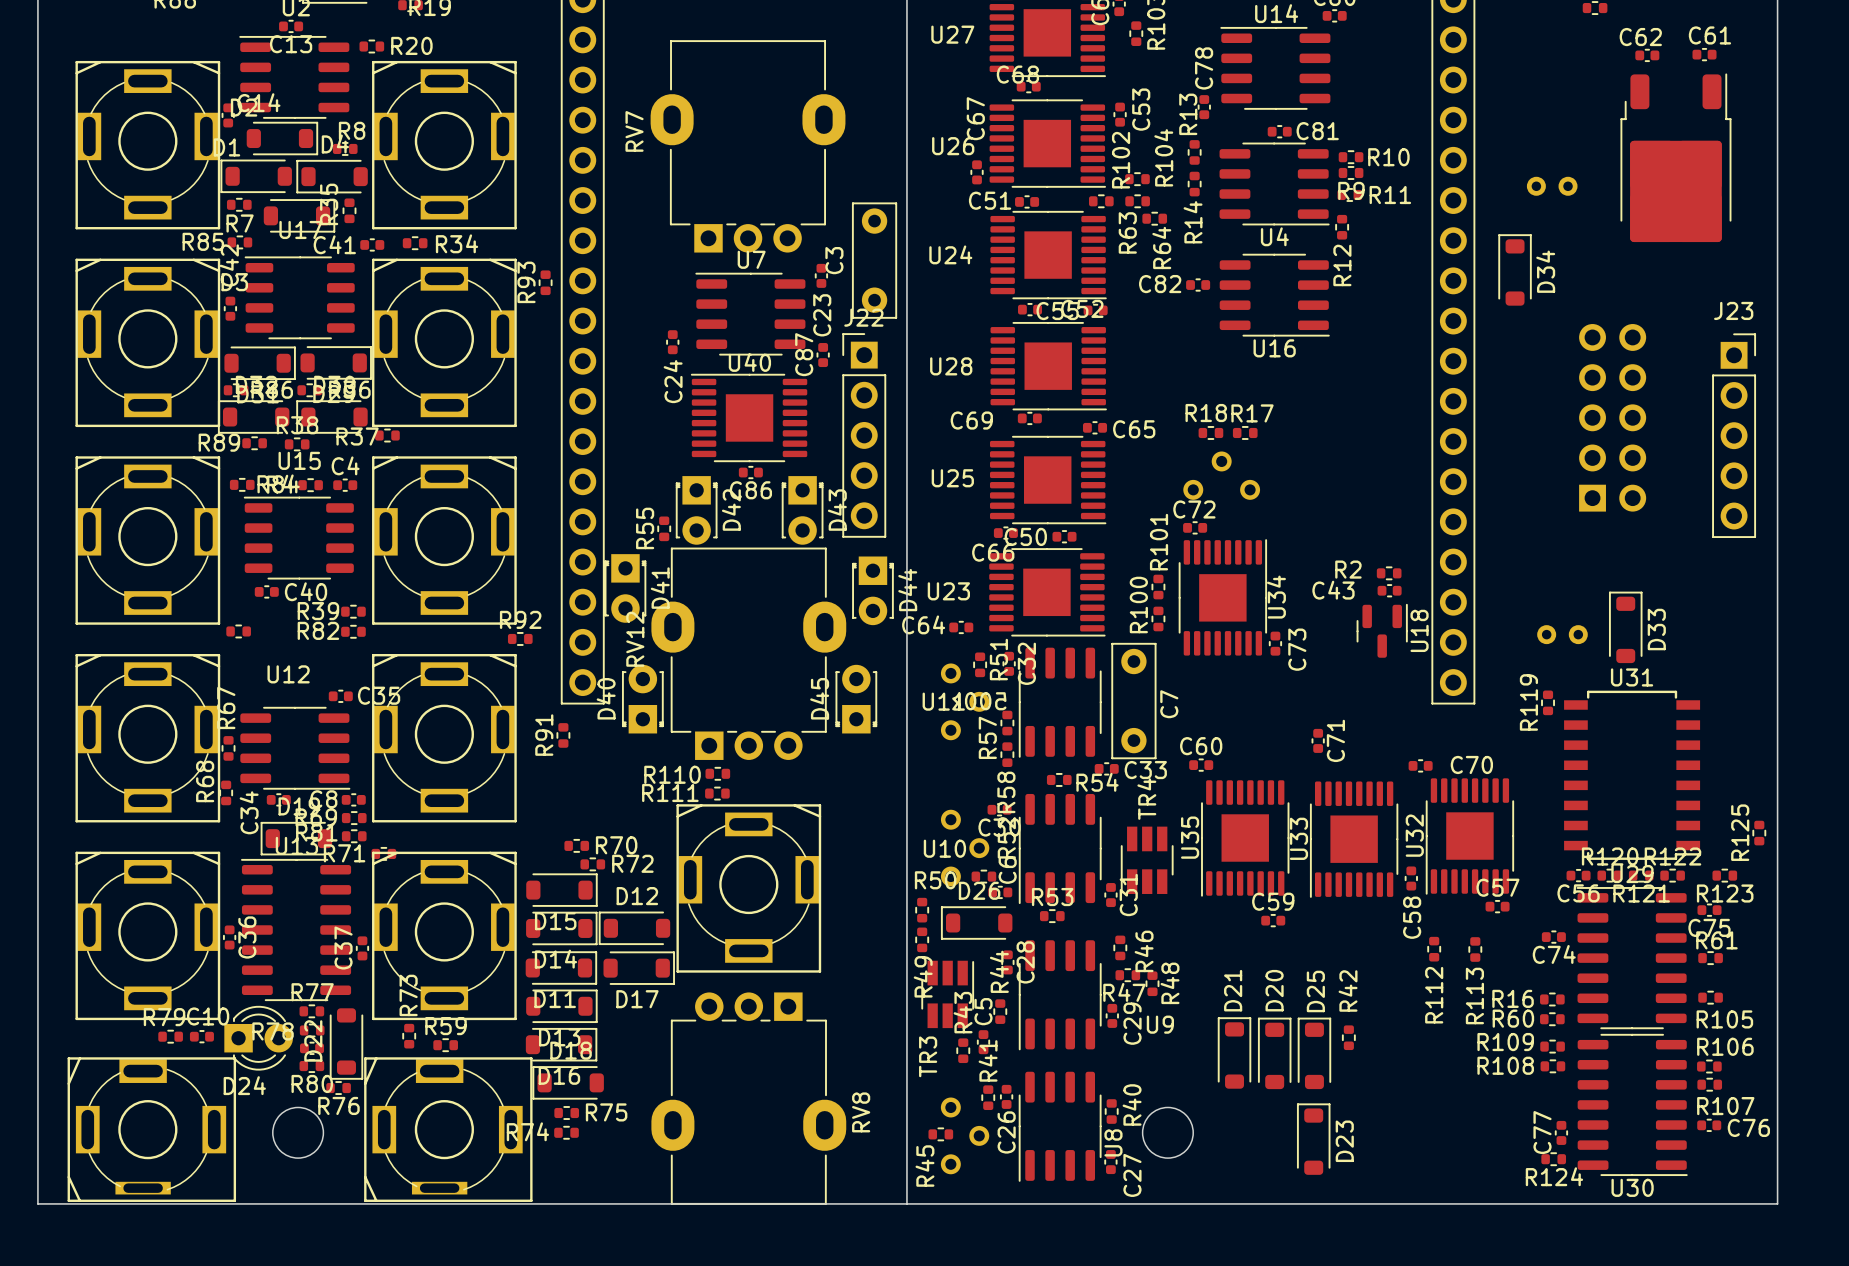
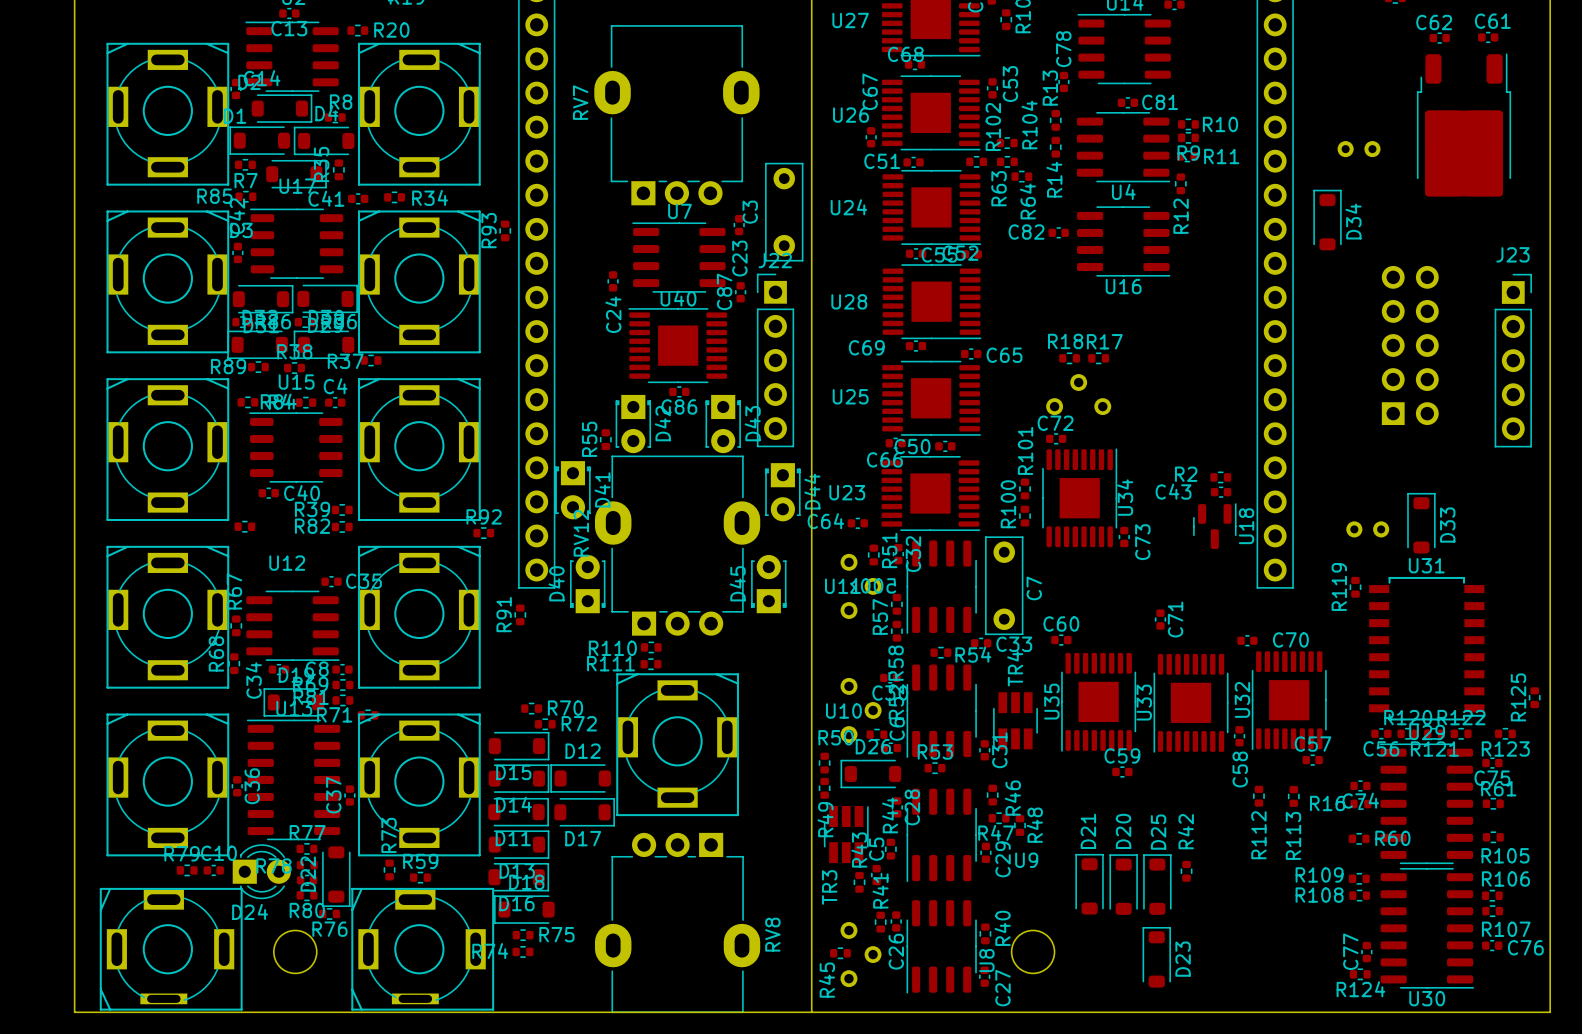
R16: none -> (1360, 803)
R16 name: R16 (1513, 998) -> R60 (1392, 838)
R60: (1552, 1019) -> none

